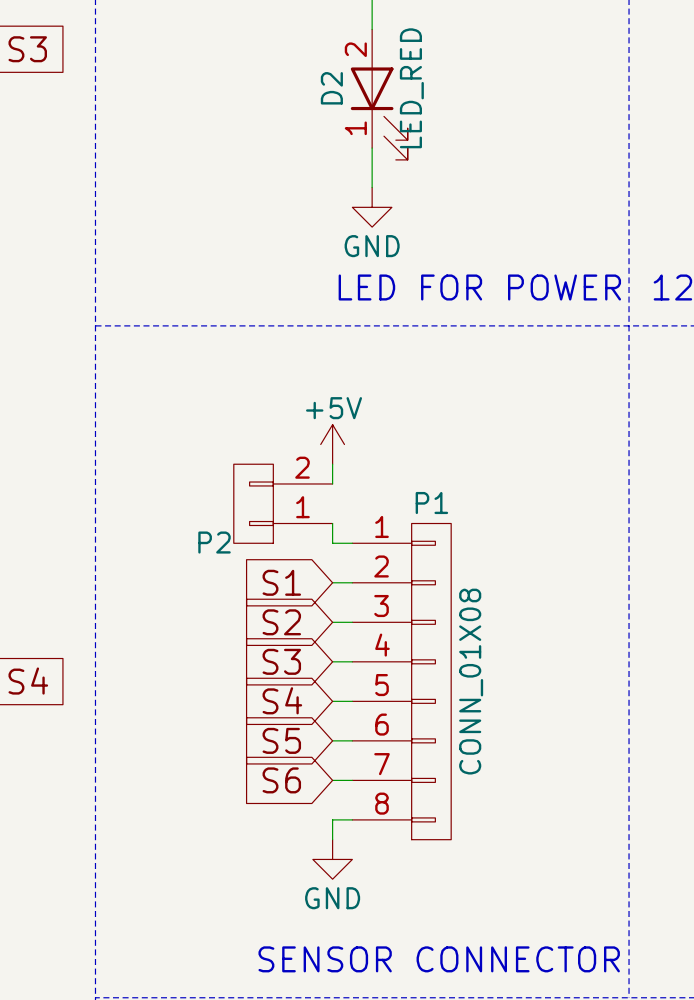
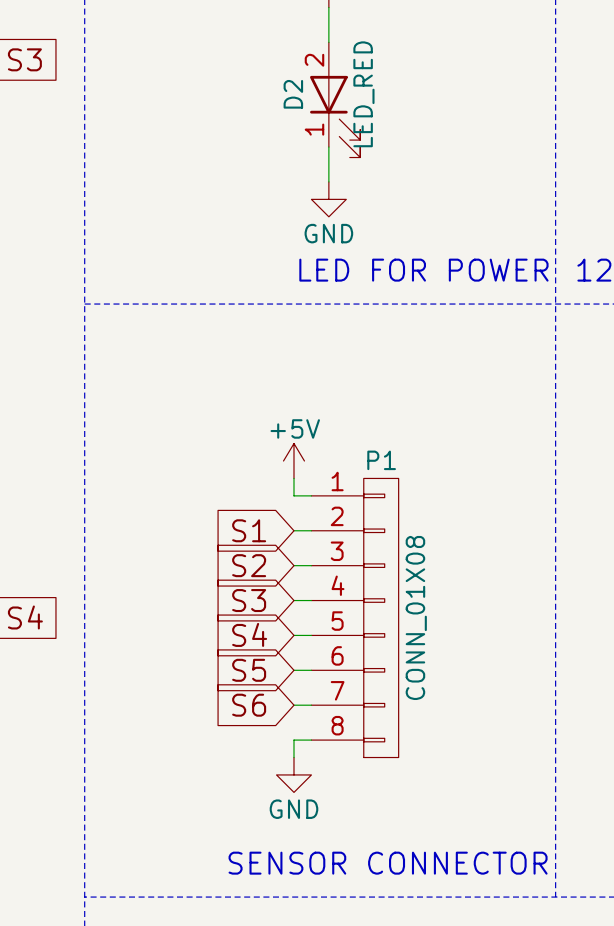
power symbol position: +5V (332, 444) -> +5V (293, 461)
wire: (332, 464) (332, 483) -> none
P2: (283, 503) -> none

